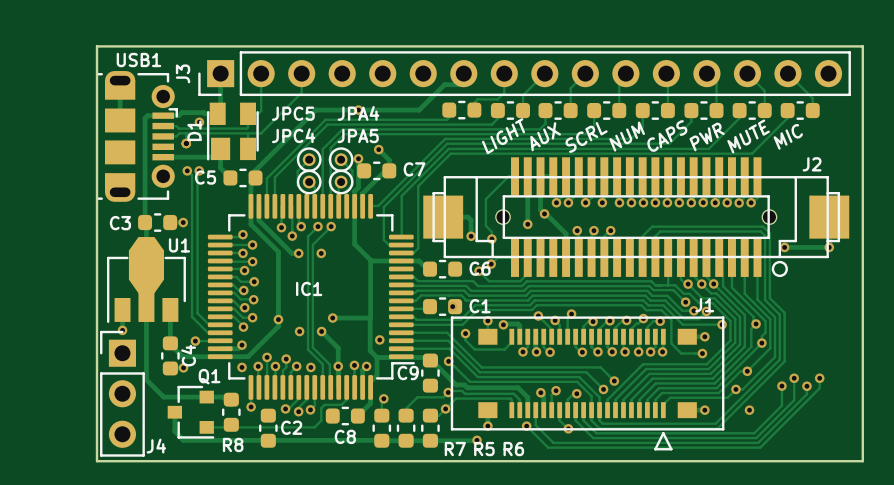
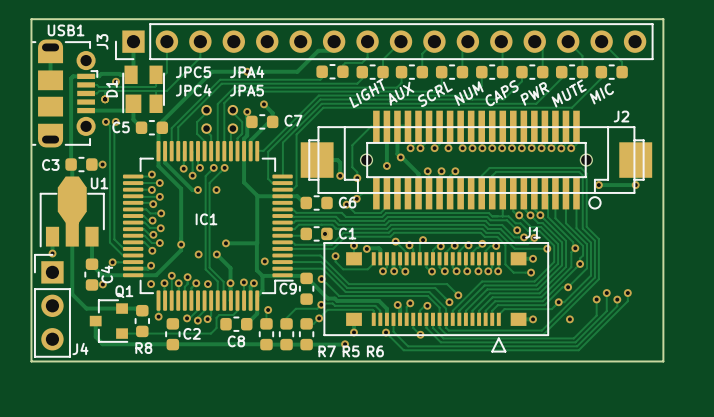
JPC5 footprint: [296, 147, 322, 173] -> [201, 104, 212, 116]
JPA4 footprint: [328, 147, 354, 173] -> [227, 104, 239, 116]
JPC4 footprint: [296, 169, 322, 195] -> [201, 123, 212, 134]
JPA5 footprint: [328, 169, 354, 195] -> [227, 123, 239, 134]

